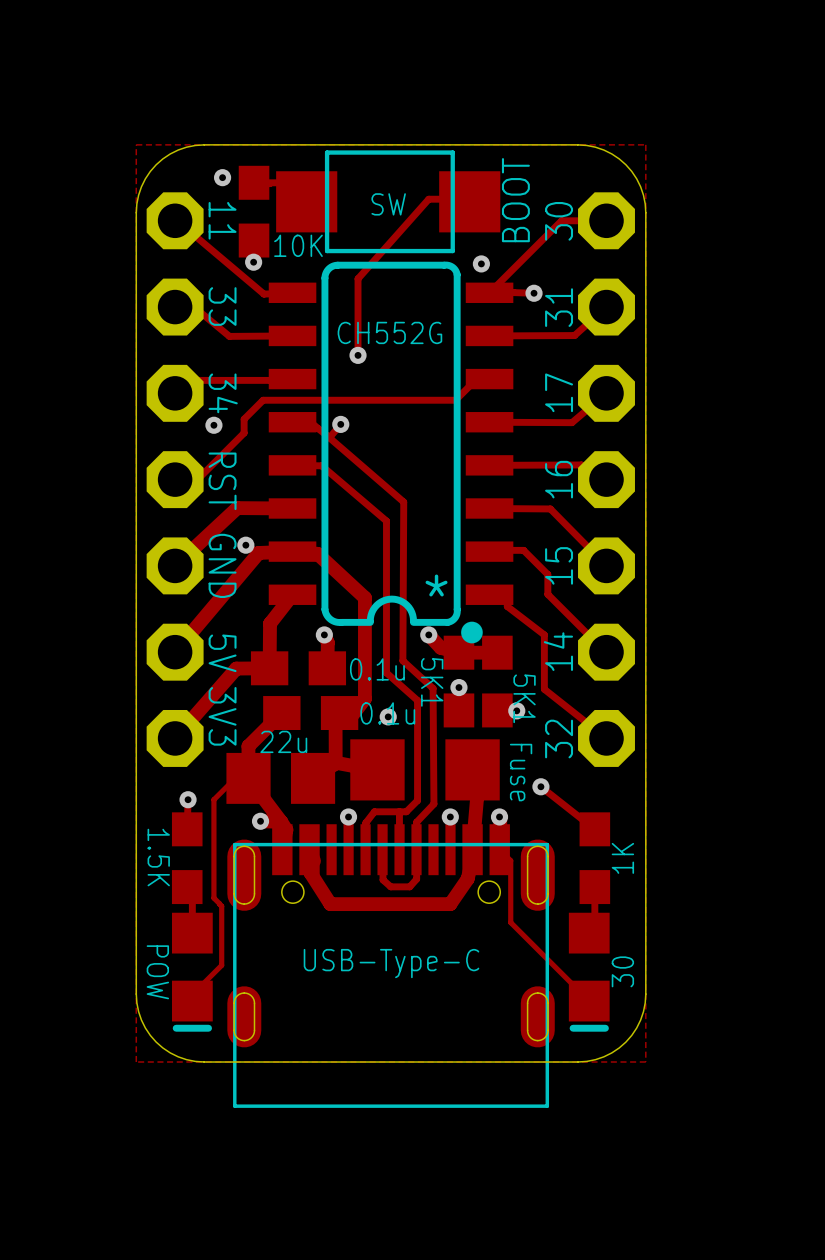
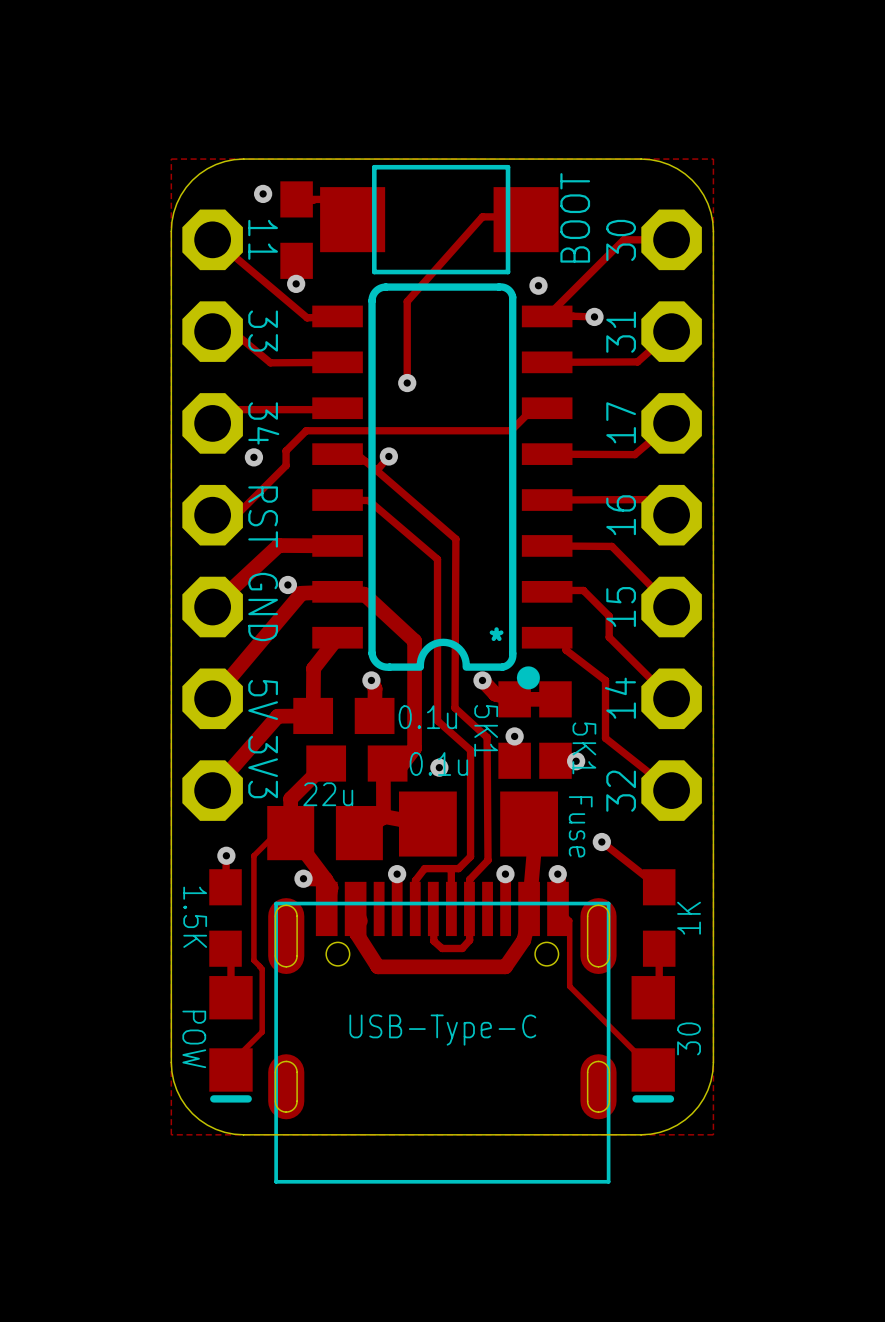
text: SW (388, 204) -> none
text: 10K (298, 245) -> none
text: CH552G (389, 332) -> none
text: * (436, 585) -> none
part name: none -> * (496, 634)

